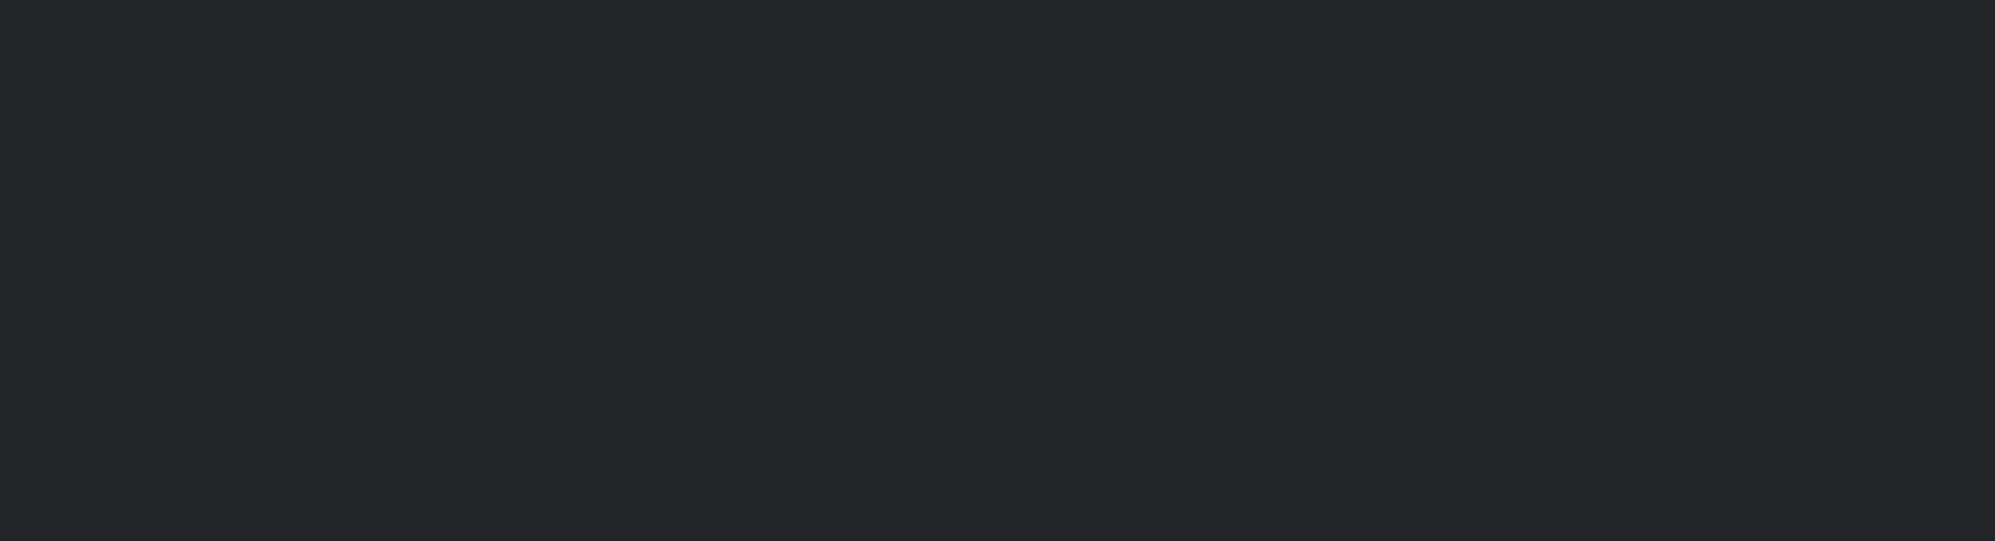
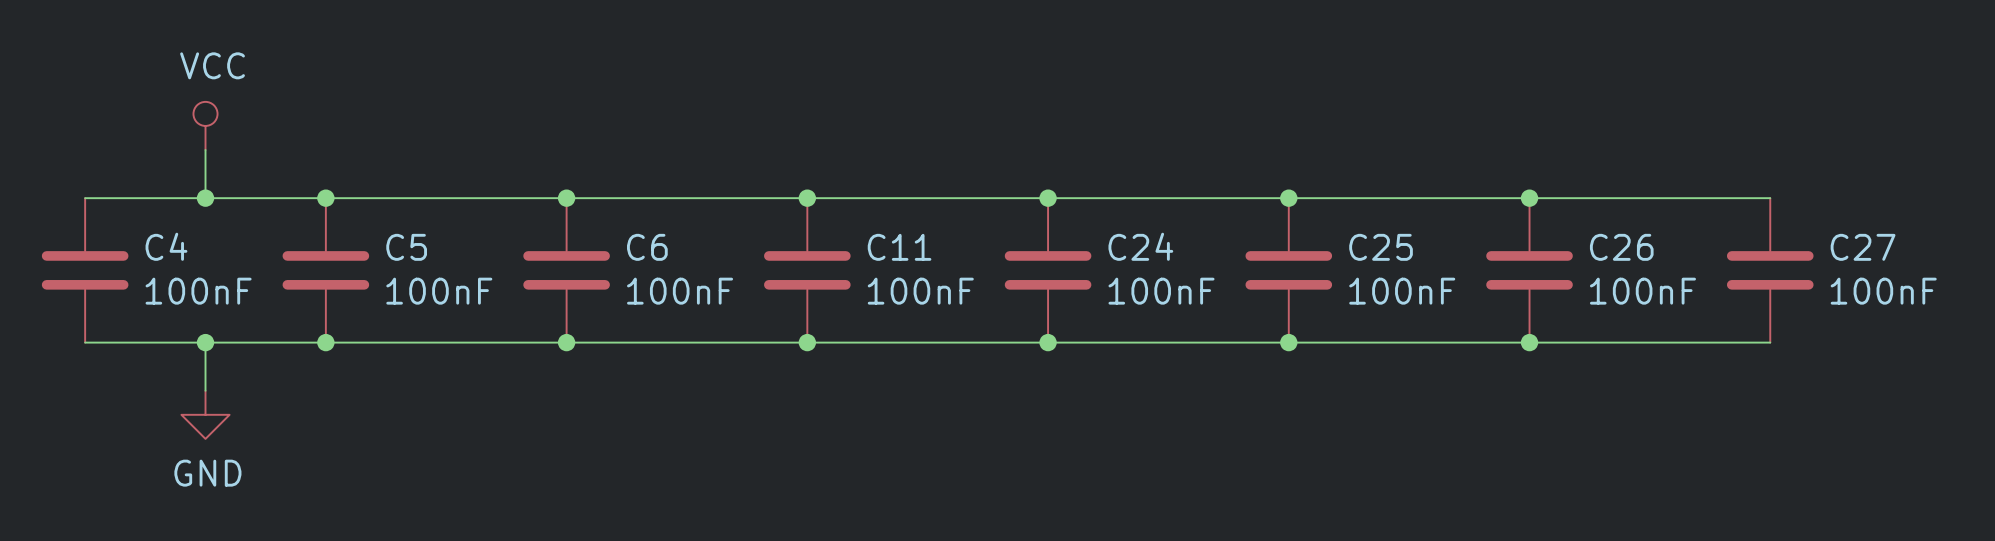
power symbol: none -> VCC (205, 125)
wire: none -> (205, 150) (205, 198)
wire: none -> (85, 198) (1770, 198)
junction: none -> (205, 198)
junction: none -> (325, 198)
junction: none -> (566, 198)
junction: none -> (807, 198)
junction: none -> (1048, 198)
junction: none -> (1288, 198)
junction: none -> (1529, 198)
C4: none -> 100nF (85, 270)
C5: none -> 100nF (325, 270)
C6: none -> 100nF (566, 270)
C11: none -> 100nF (807, 270)
C24: none -> 100nF (1048, 270)
C25: none -> 100nF (1288, 270)
C26: none -> 100nF (1529, 270)
C27: none -> 100nF (1770, 270)
wire: none -> (85, 342) (1770, 342)
wire: none -> (205, 342) (205, 390)
junction: none -> (205, 342)
junction: none -> (325, 342)
junction: none -> (566, 342)
junction: none -> (807, 342)
junction: none -> (1048, 342)
junction: none -> (1288, 342)
junction: none -> (1529, 342)
power symbol: none -> GND (205, 414)

